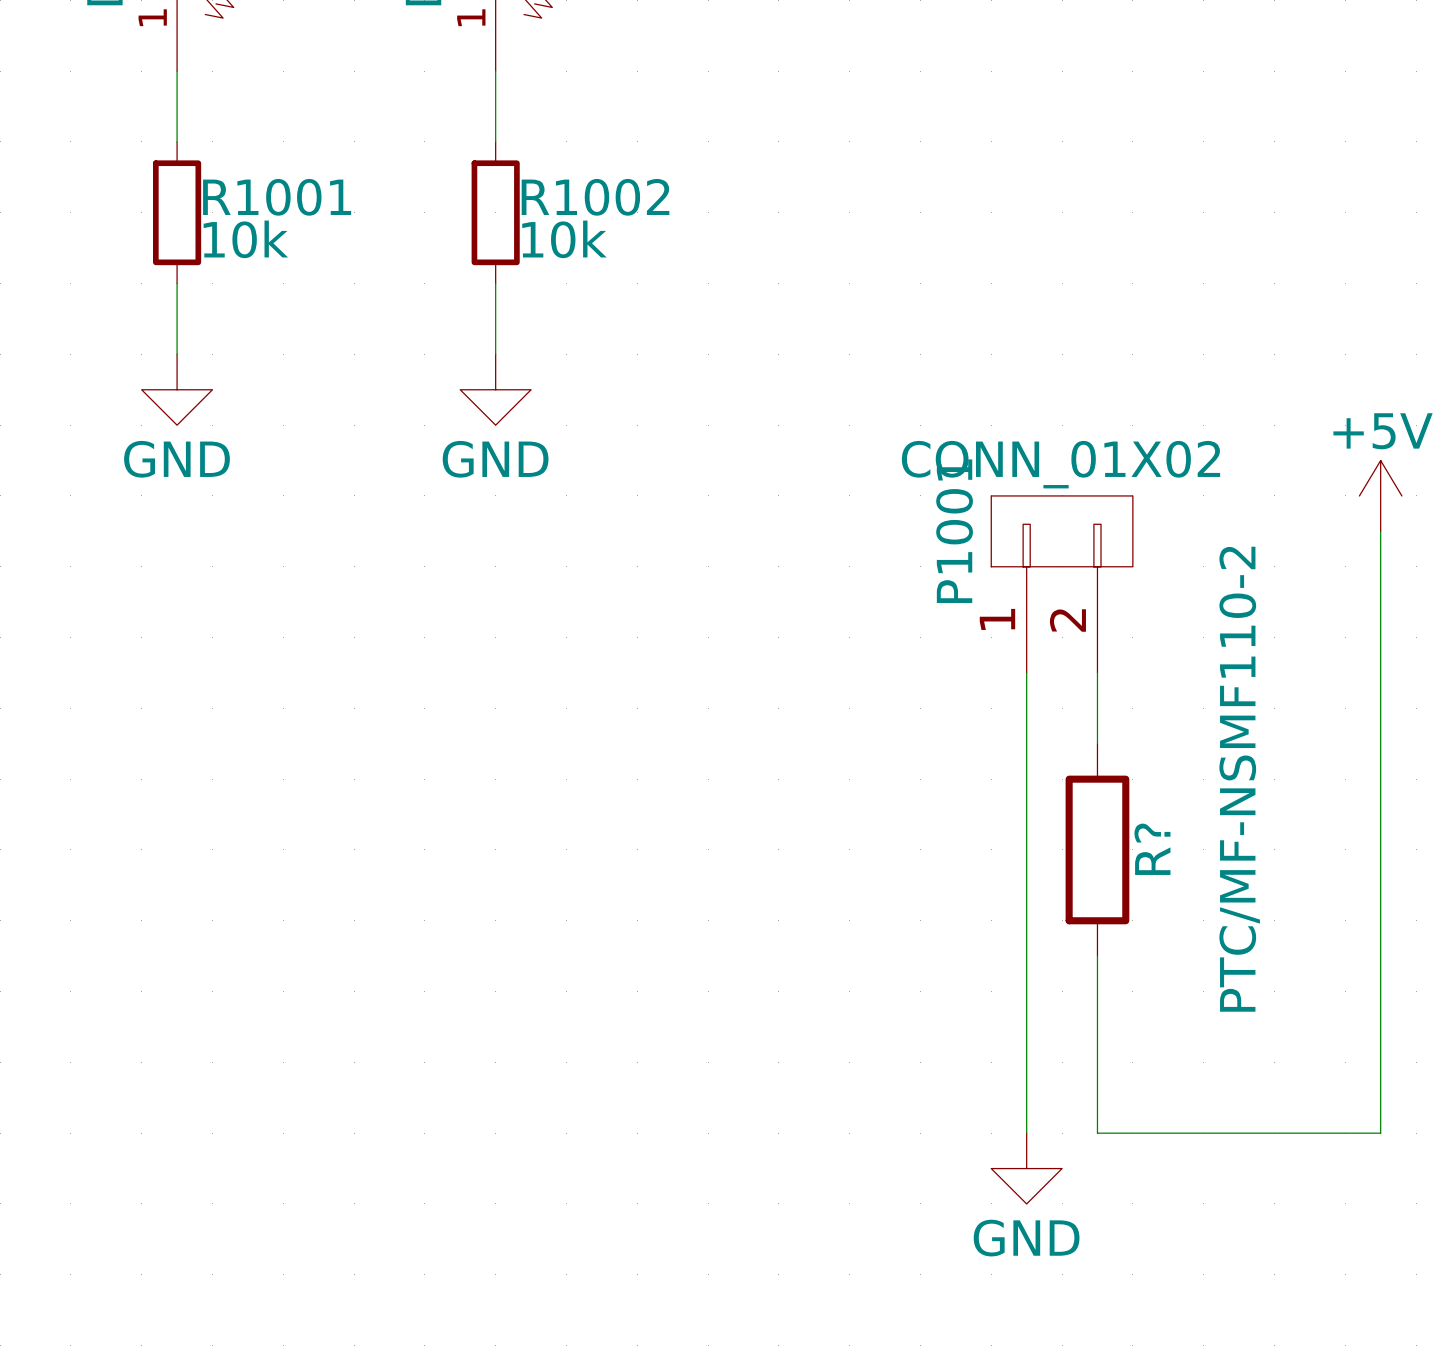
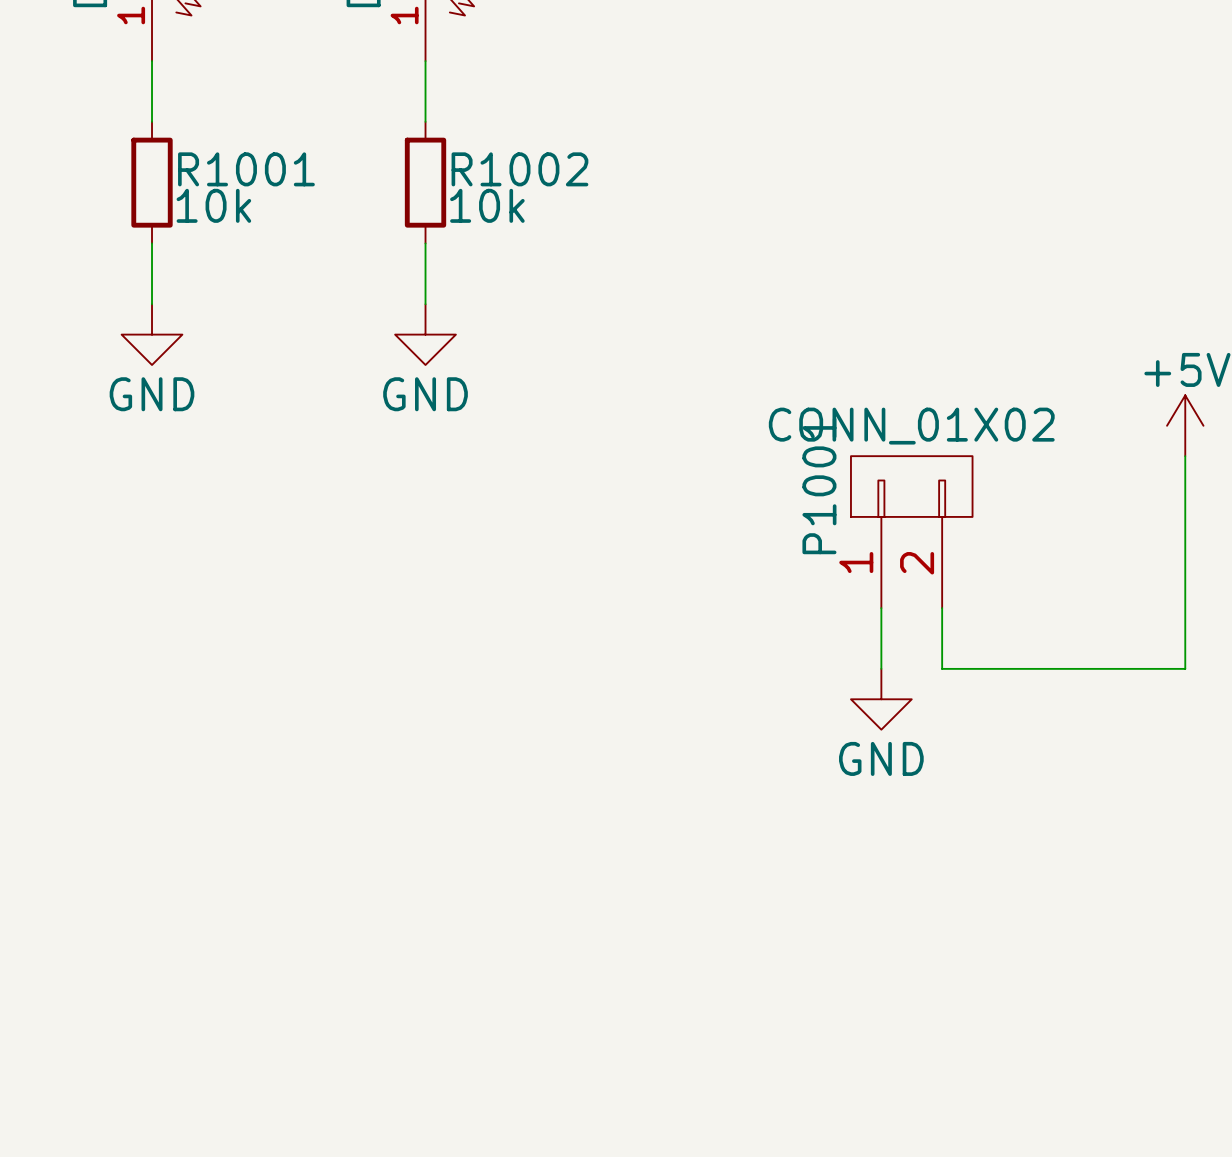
P1001 position: (1062, 584) -> (911, 532)
wire: (1026, 779) (1026, 1133) -> none
wire: (1380, 779) (1380, 1133) (1097, 1133) (1097, 956) -> (1185, 668) (942, 668) (942, 638)
R?: PTC/MF-NSMF110-2 (1097, 849) -> none
power symbol position: GND (1026, 1168) -> GND (881, 699)

